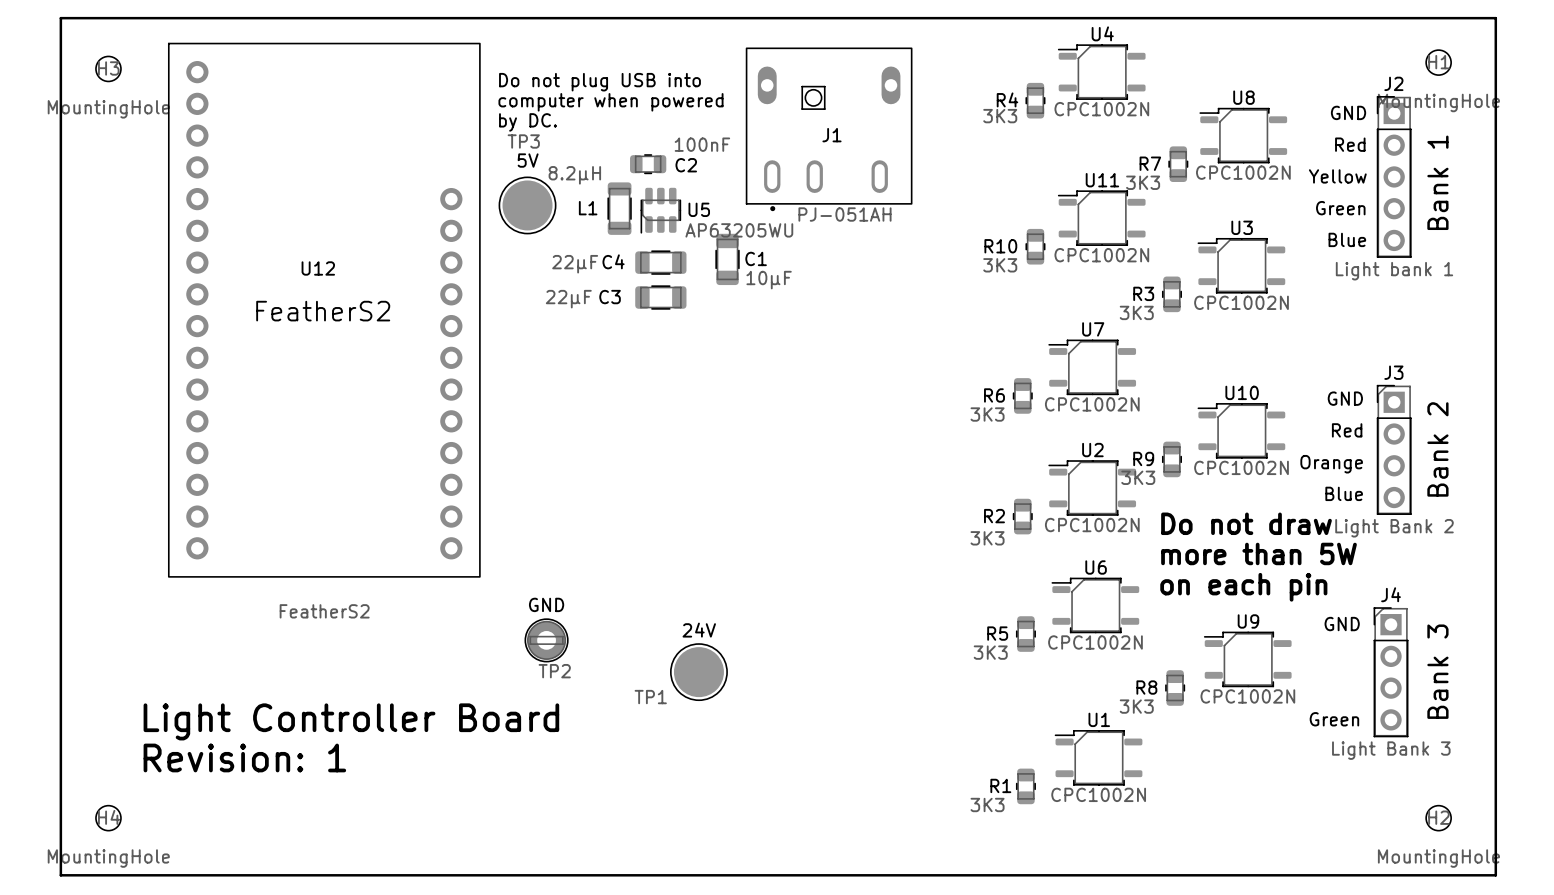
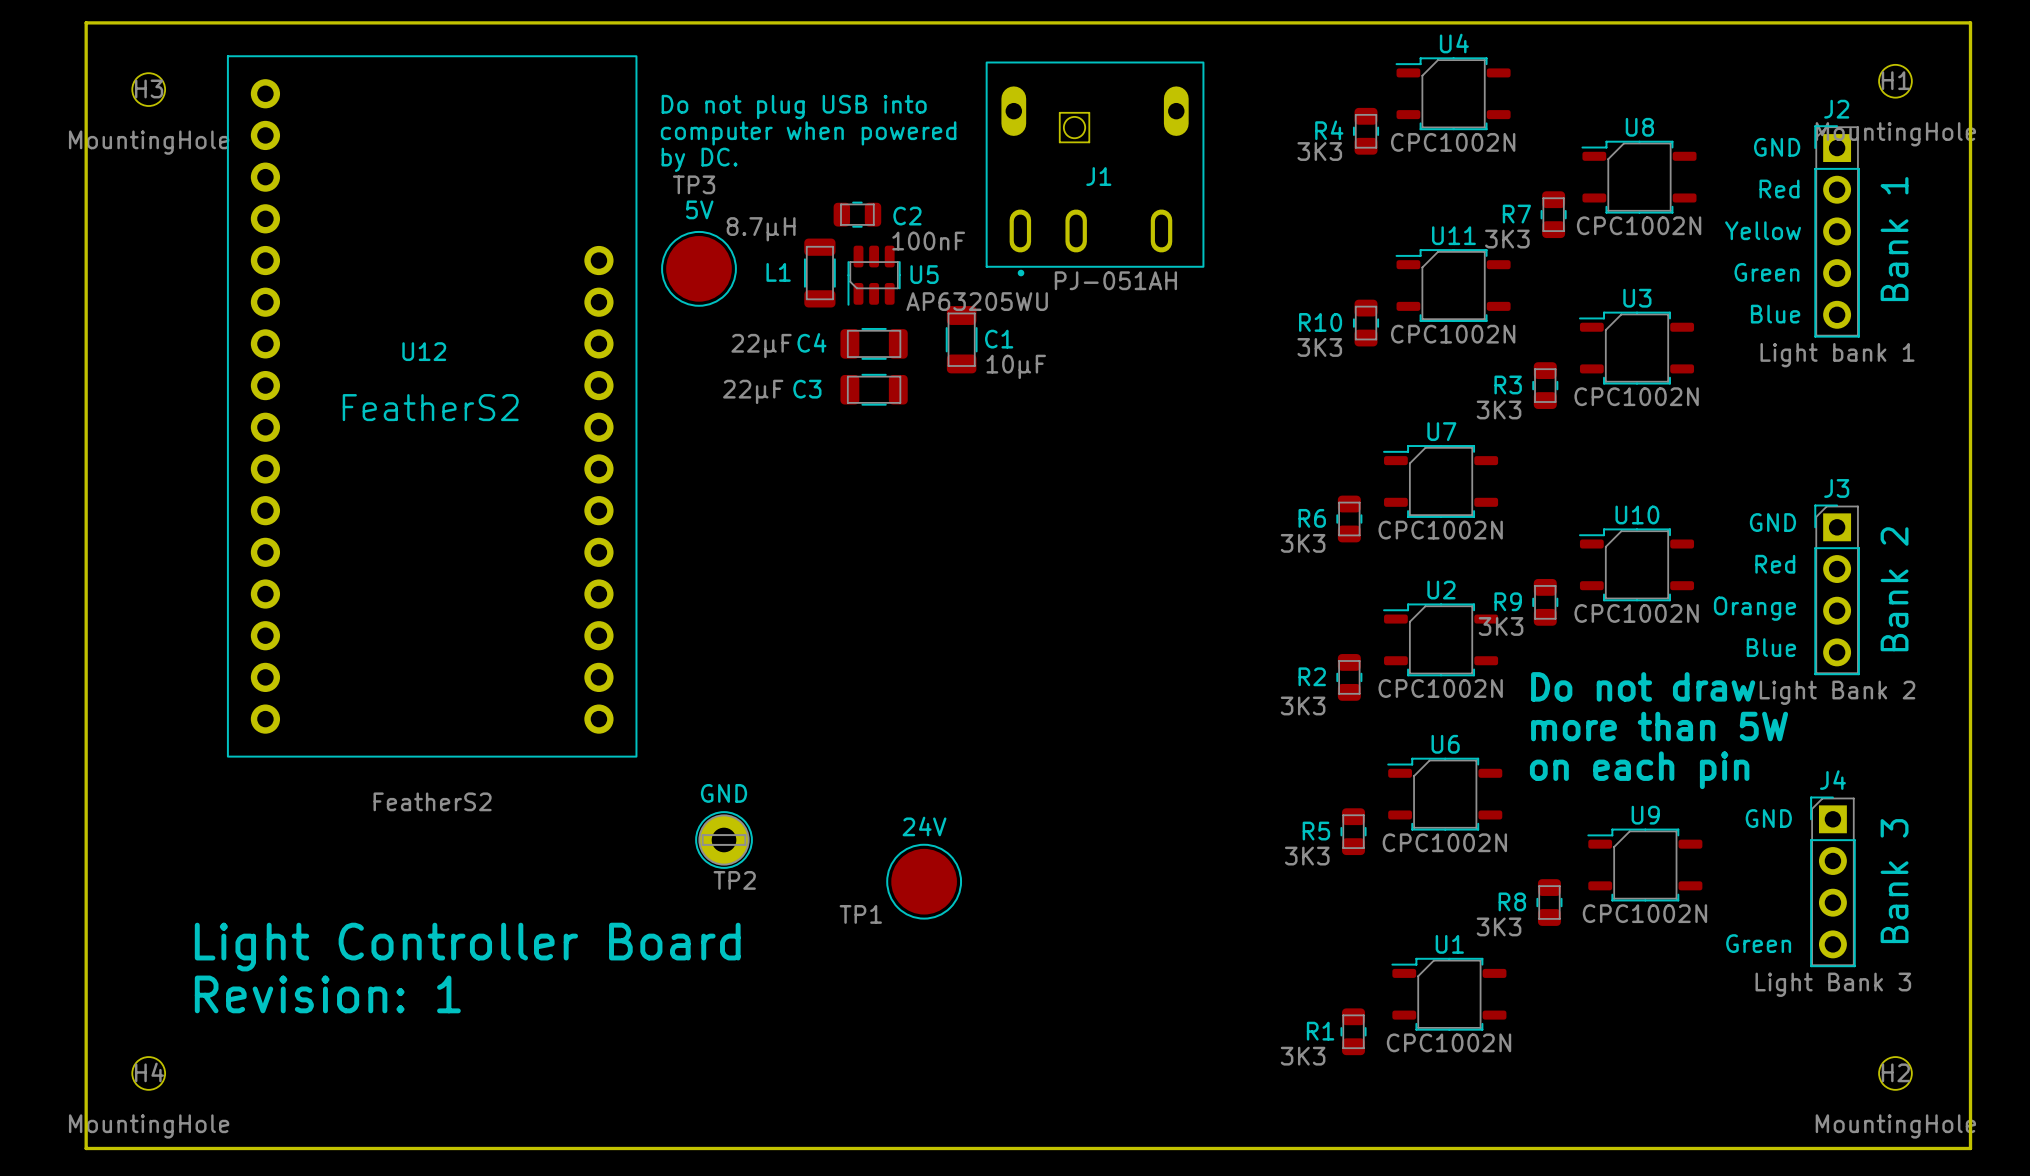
C2 value position: 100nF (702, 144) -> 100nF (928, 241)
L1 value: 8.2µH (574, 175) -> 8.7µH (761, 229)

